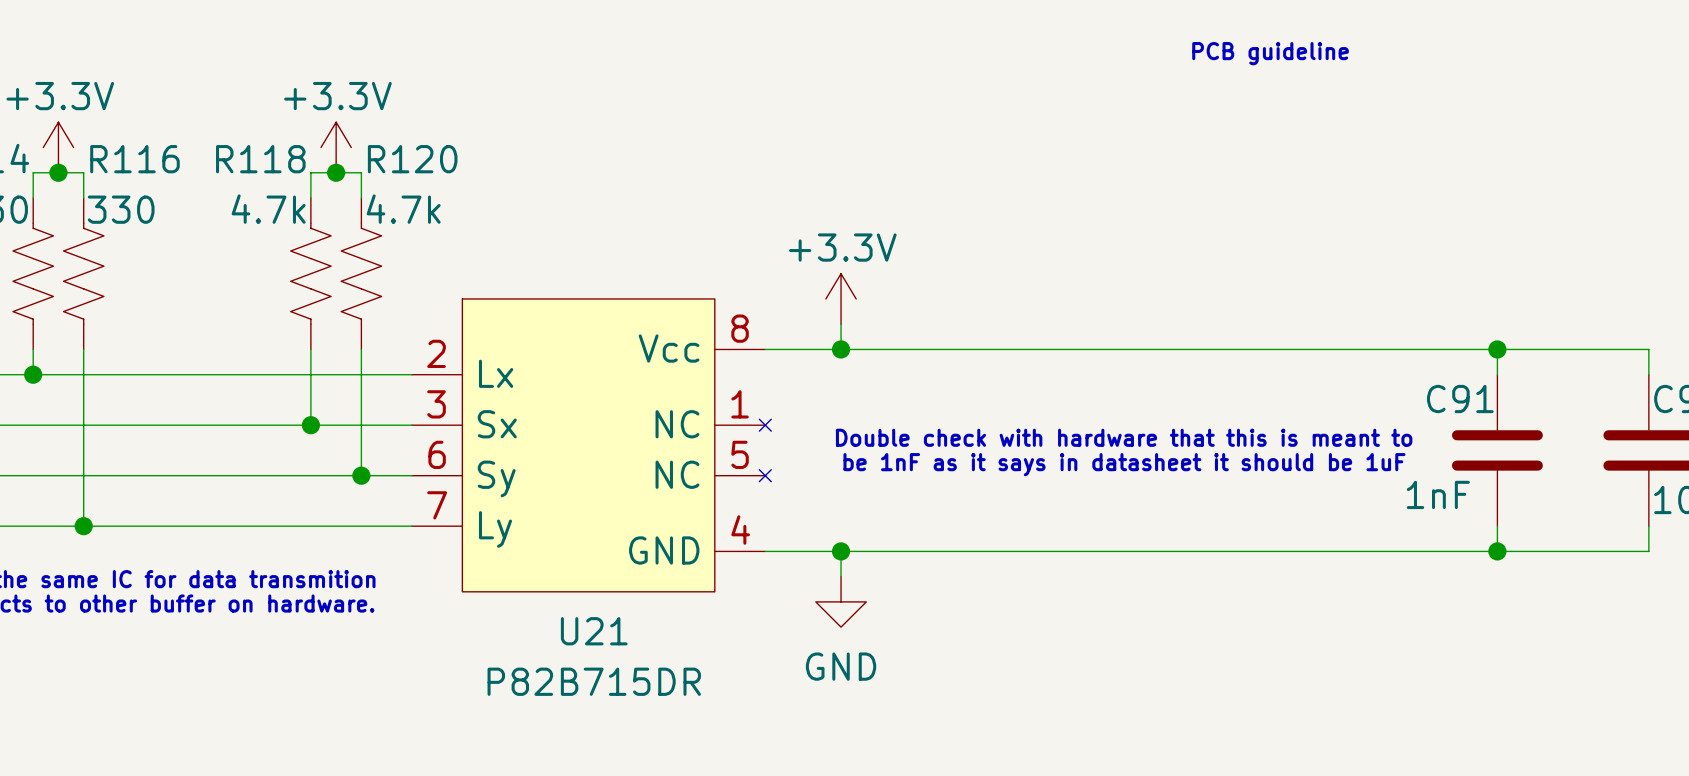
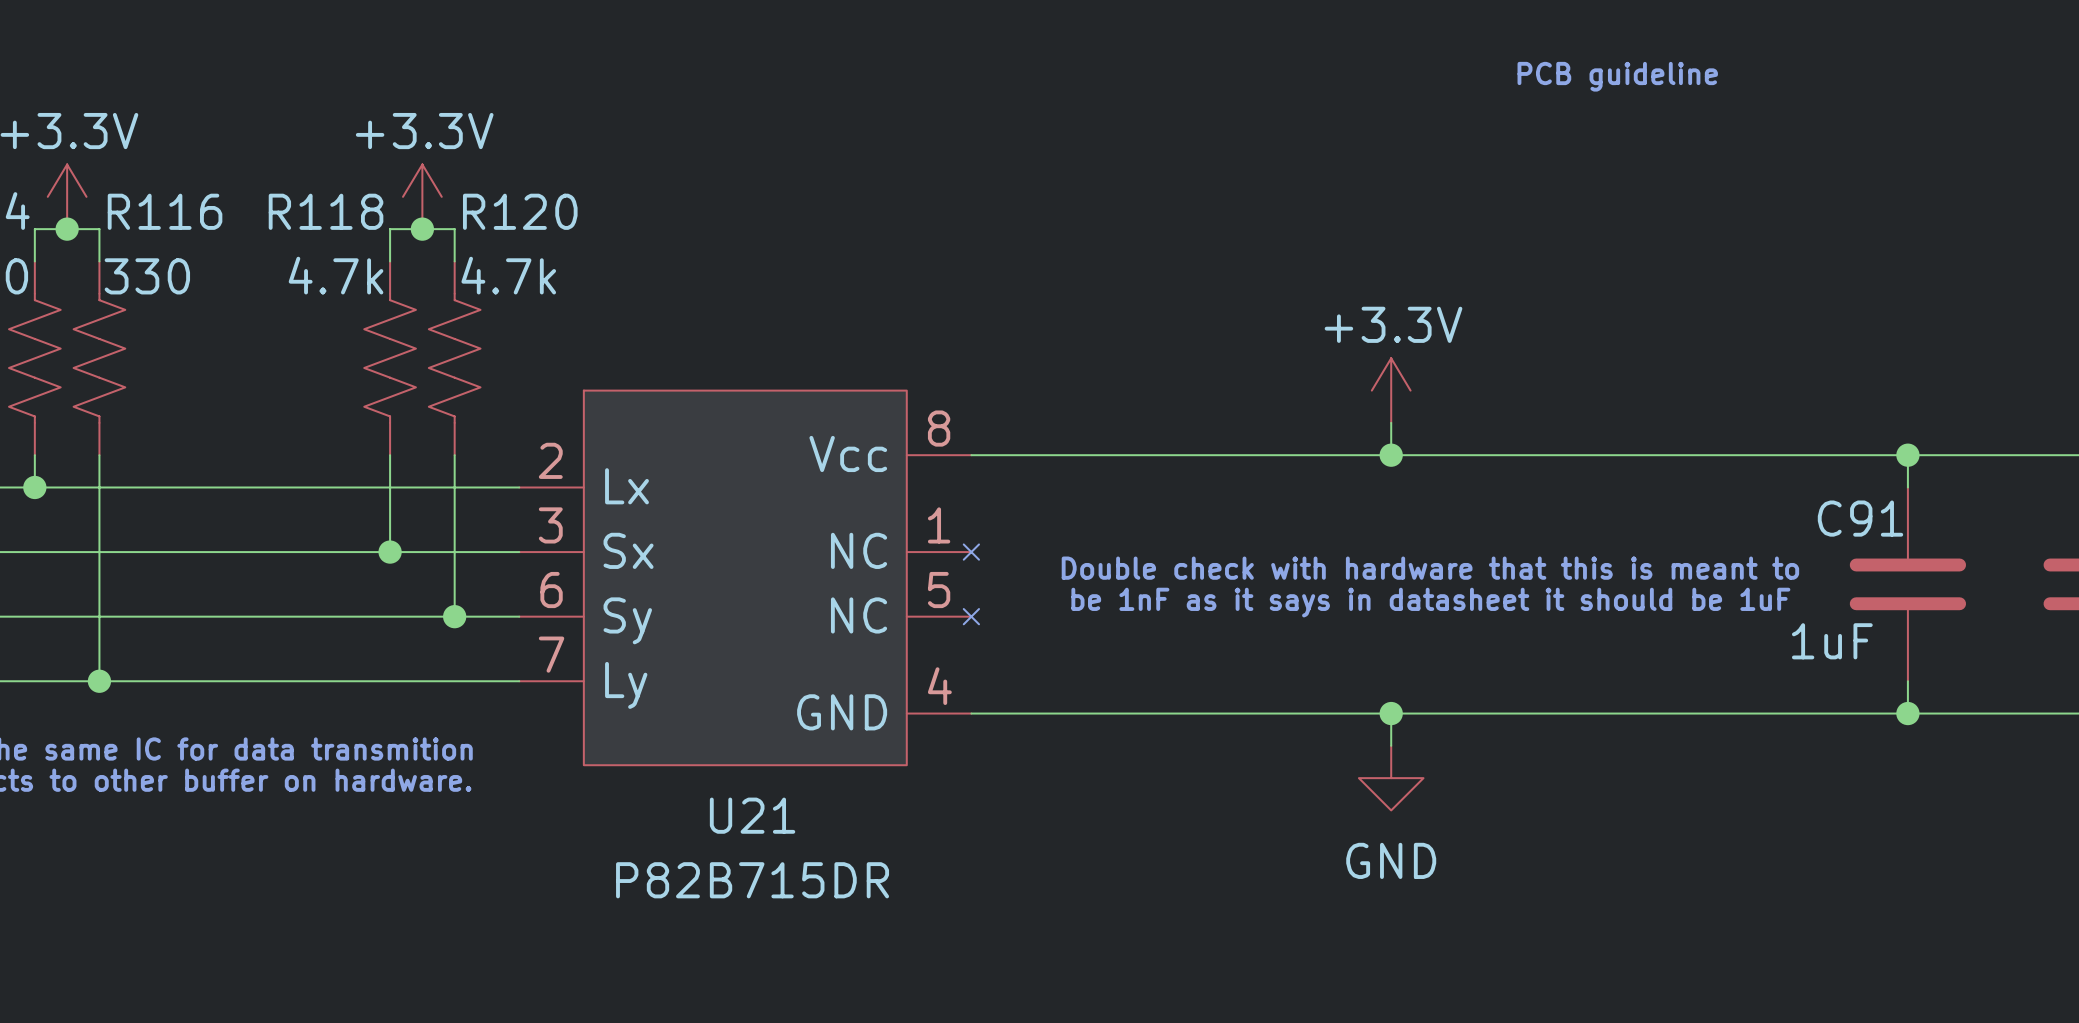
power symbol position: +3.3V (841, 298) -> +3.3V (1391, 390)
wire: (841, 324) (841, 349) -> (1391, 422) (1391, 455)
junction: (841, 349) -> none
junction: none -> (1391, 455)
C91 value: 1nF (1438, 494) -> 1uF (1832, 641)
wire: (841, 551) (841, 576) -> (1391, 713) (1391, 745)
junction: (841, 551) -> none
junction: none -> (1391, 713)
power symbol position: GND (841, 601) -> GND (1391, 778)

